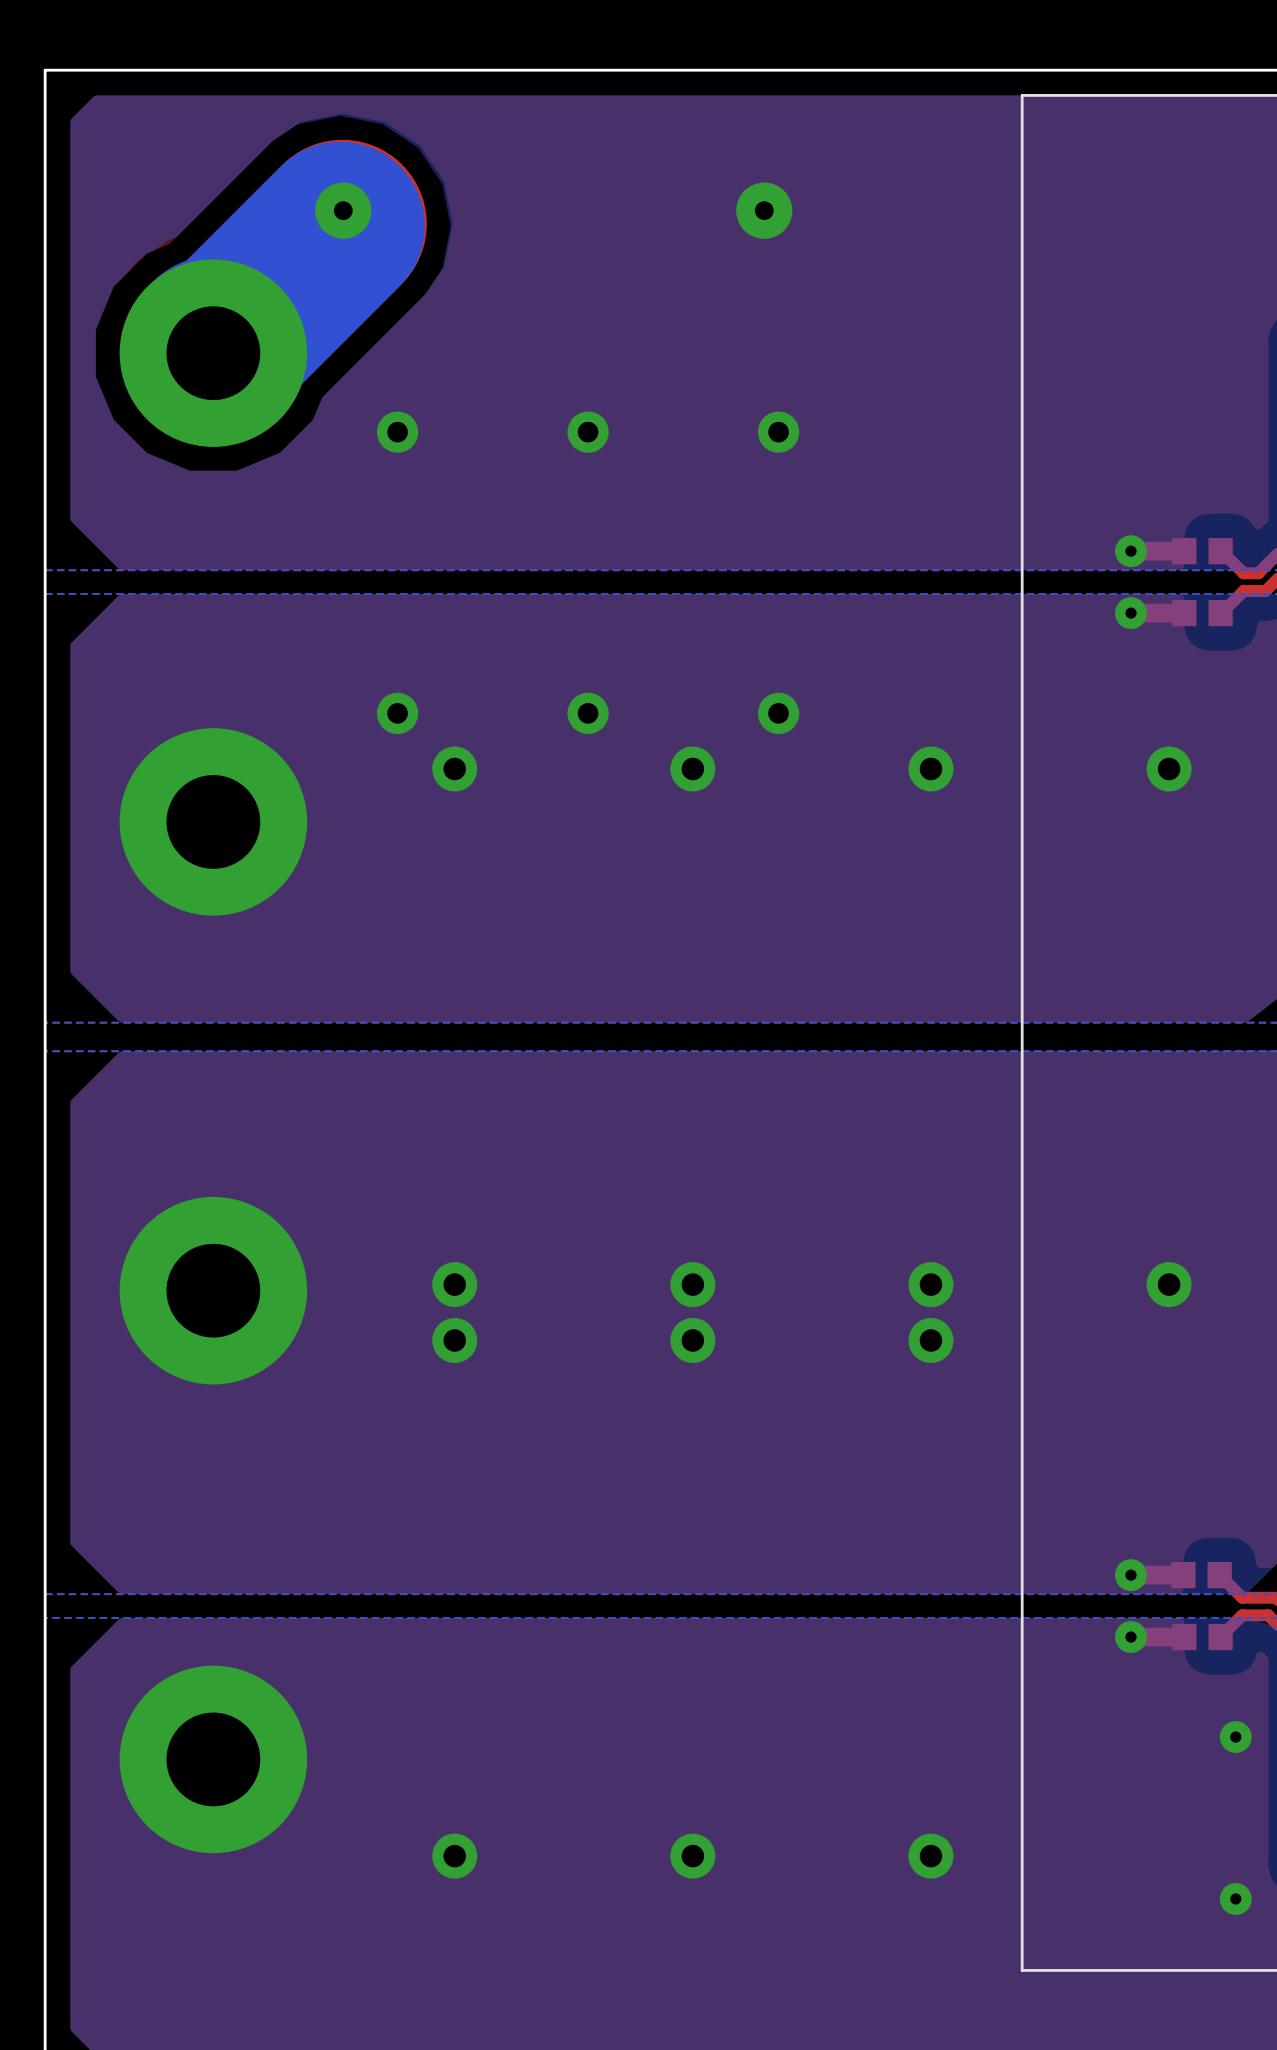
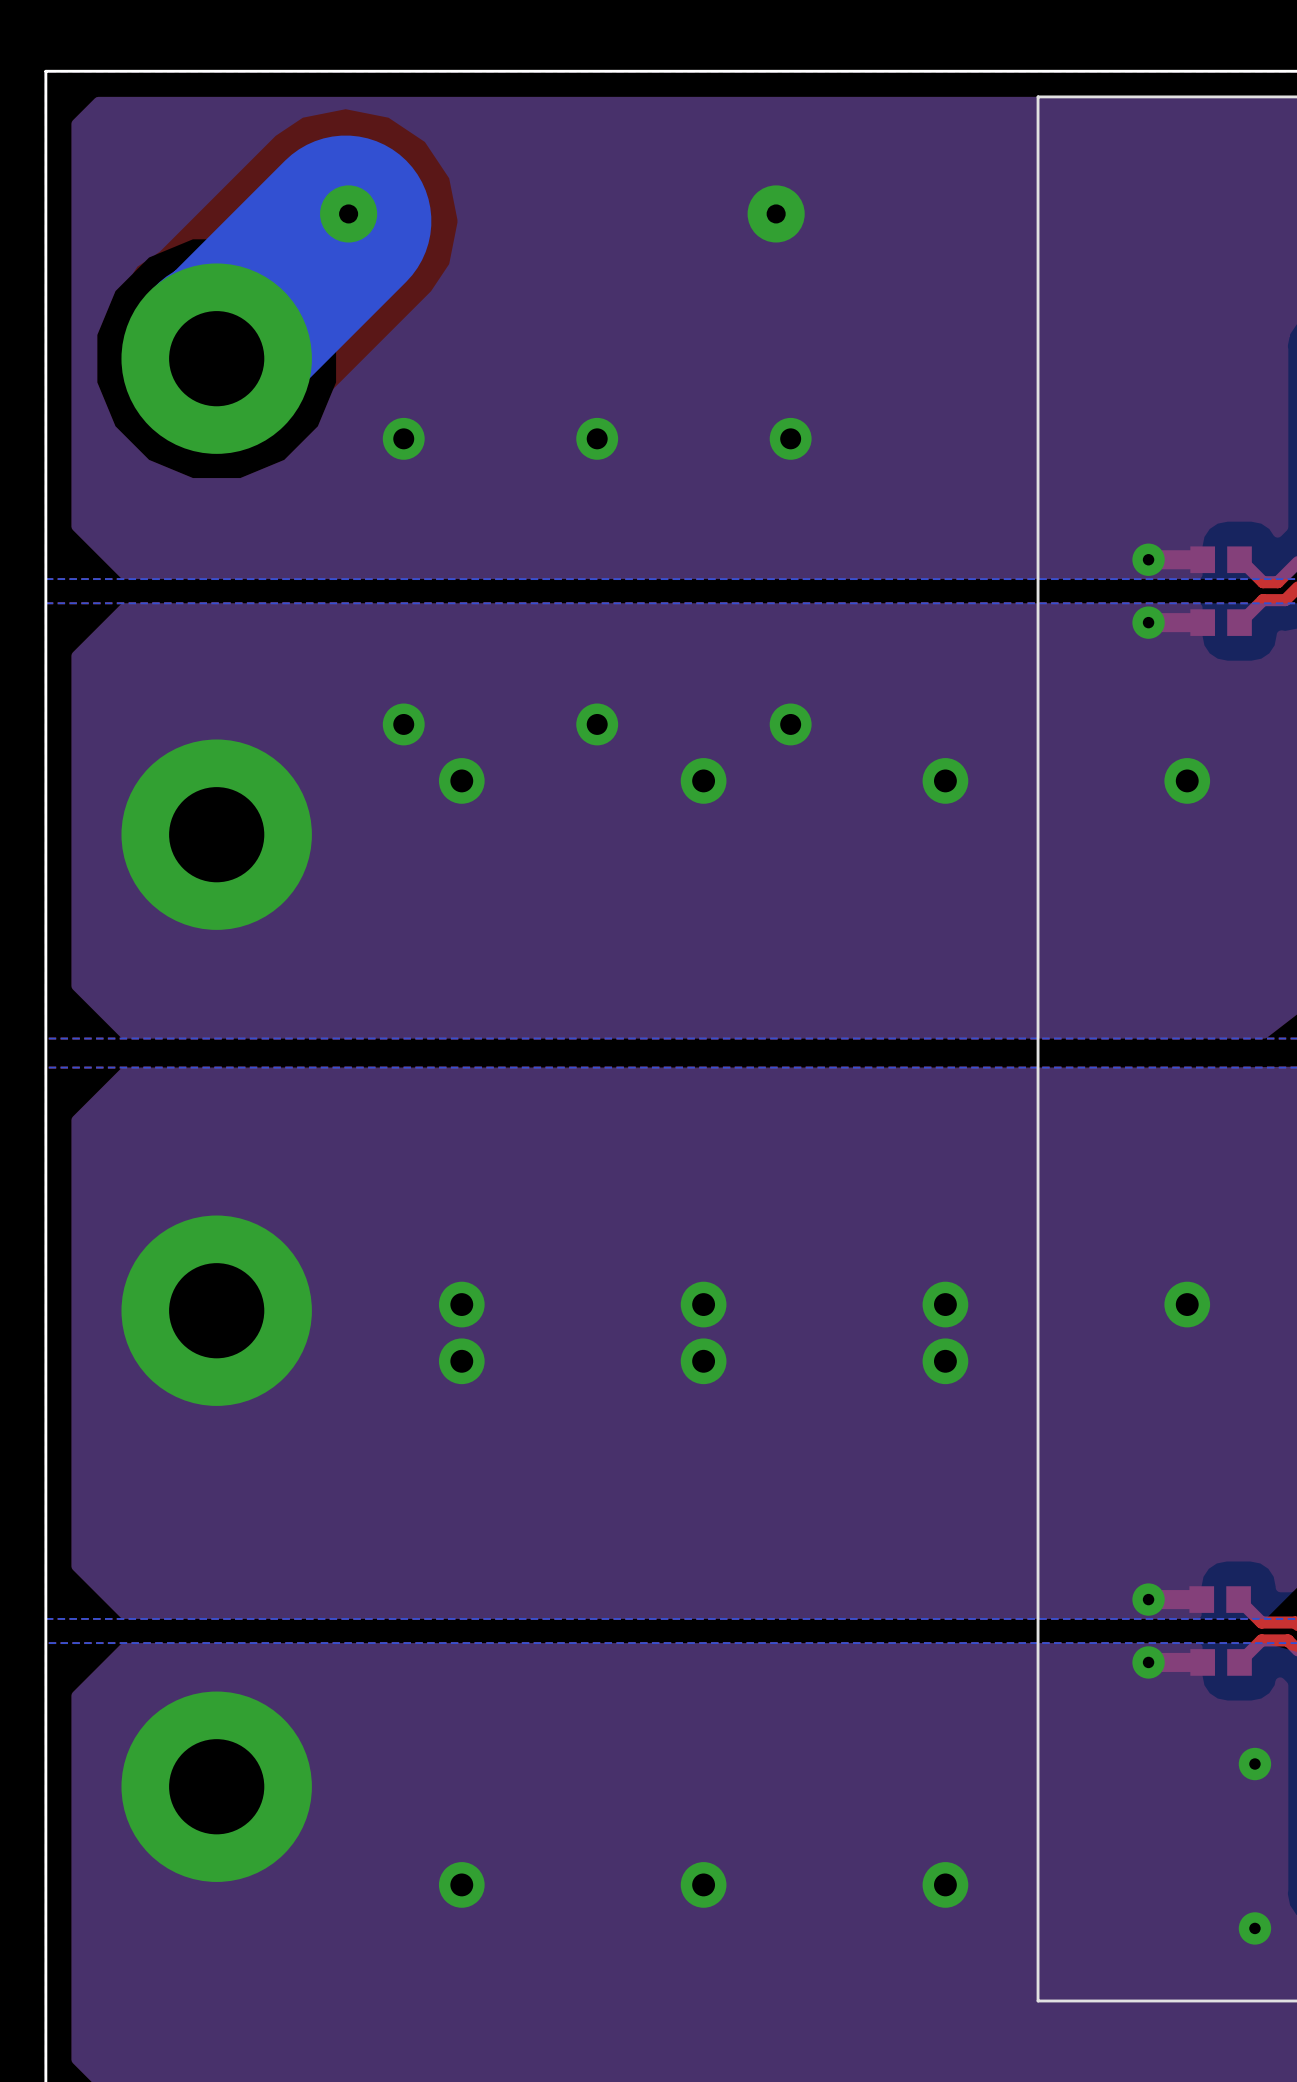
bottom track: none -> (345, 221) (213, 353)
bottom track: (340, 226) (213, 353) -> none

